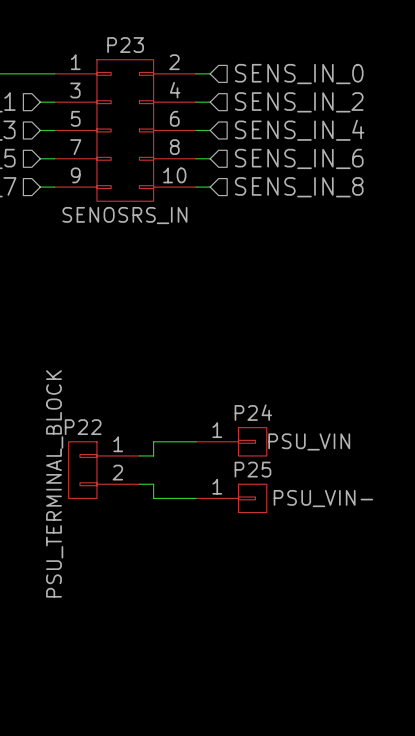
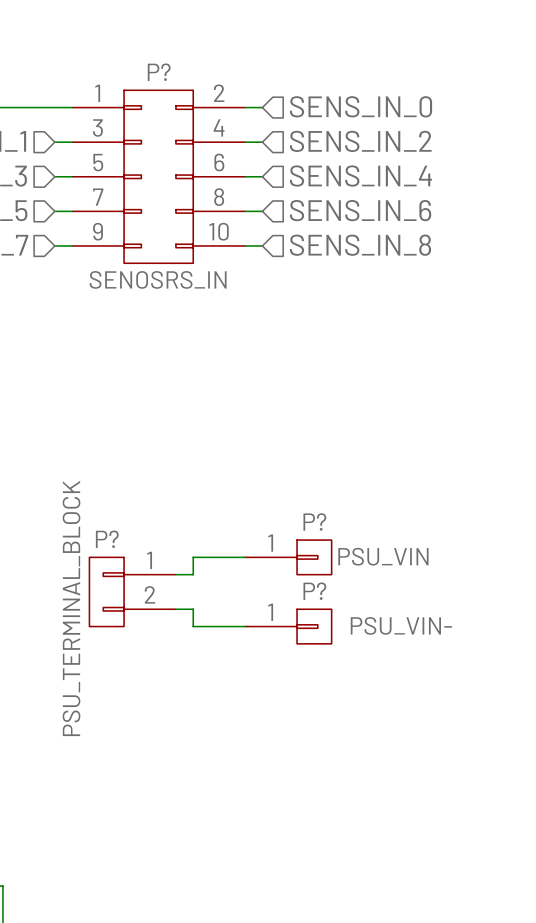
P23 name: P23 (125, 45) -> P? (159, 72)
P24 name: P24 (253, 412) -> P? (314, 522)
P22 name: P22 (83, 427) -> P? (107, 539)
P25 name: P25 (252, 469) -> P? (314, 591)

